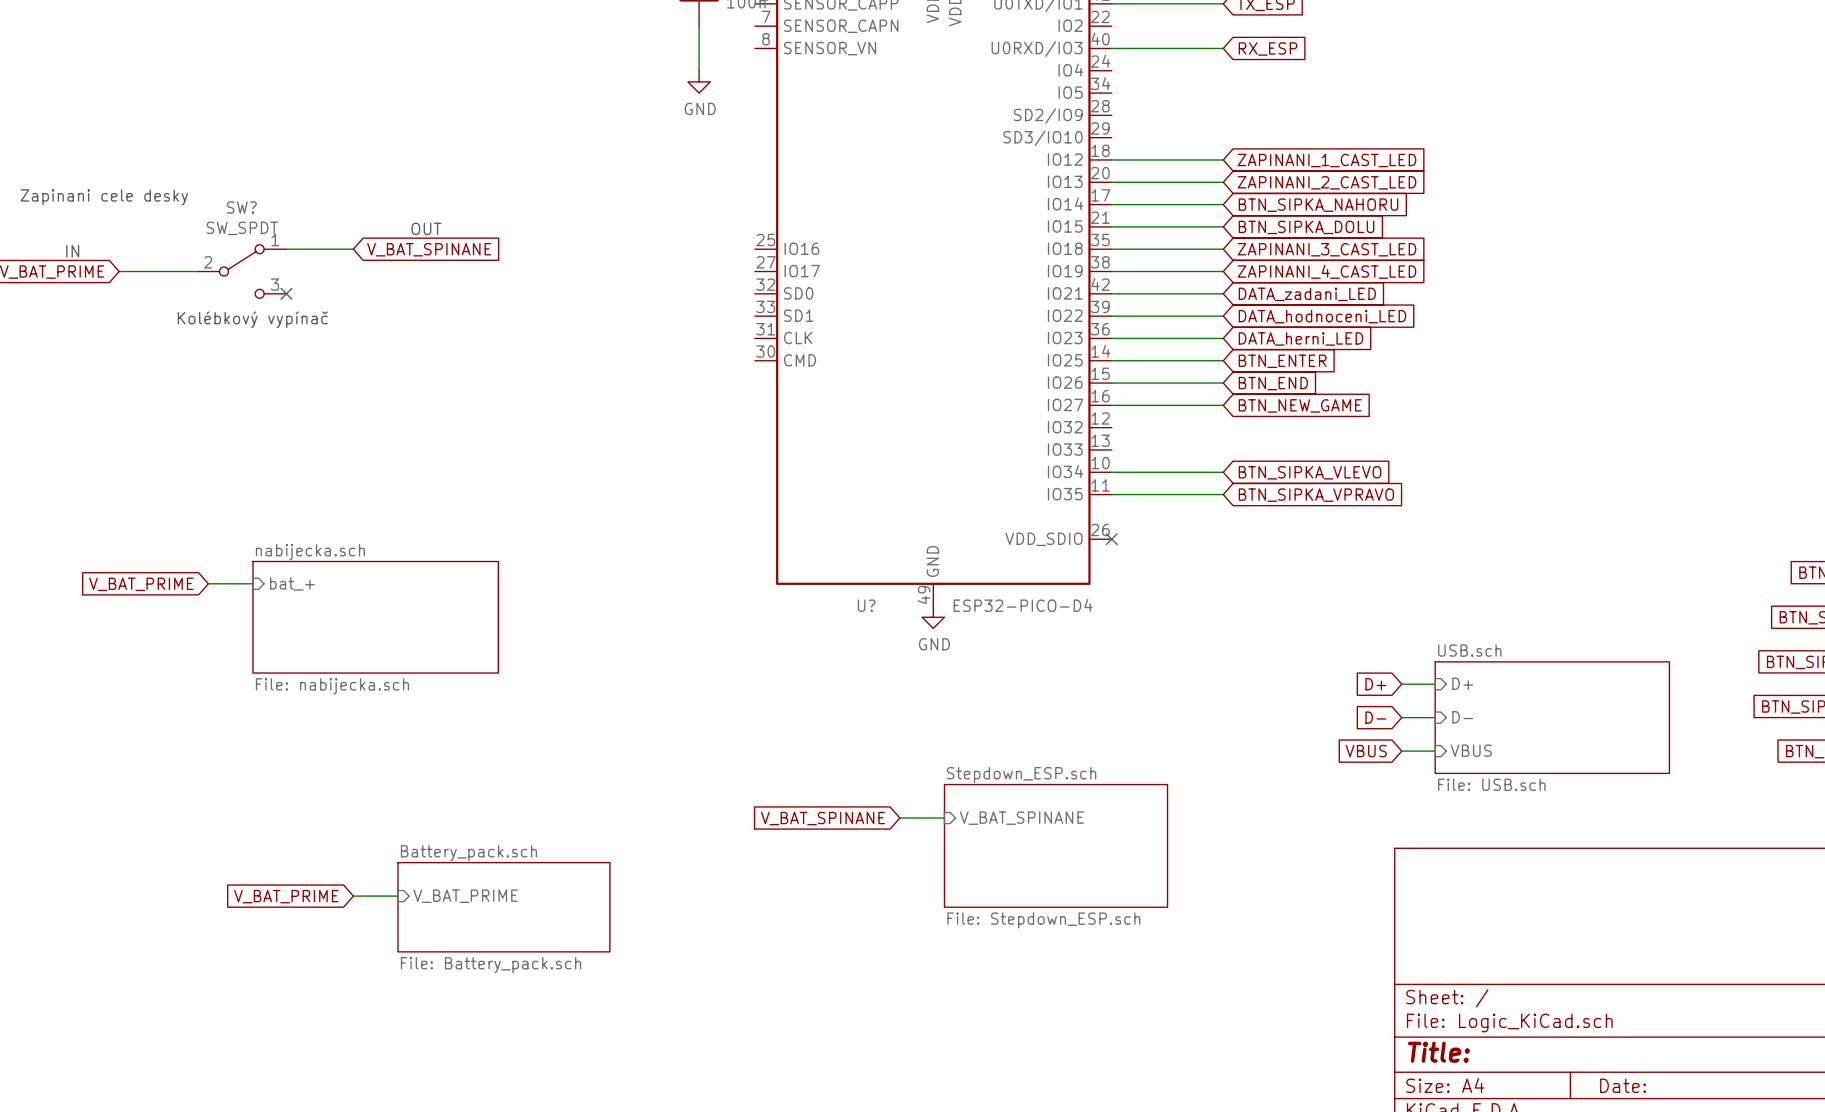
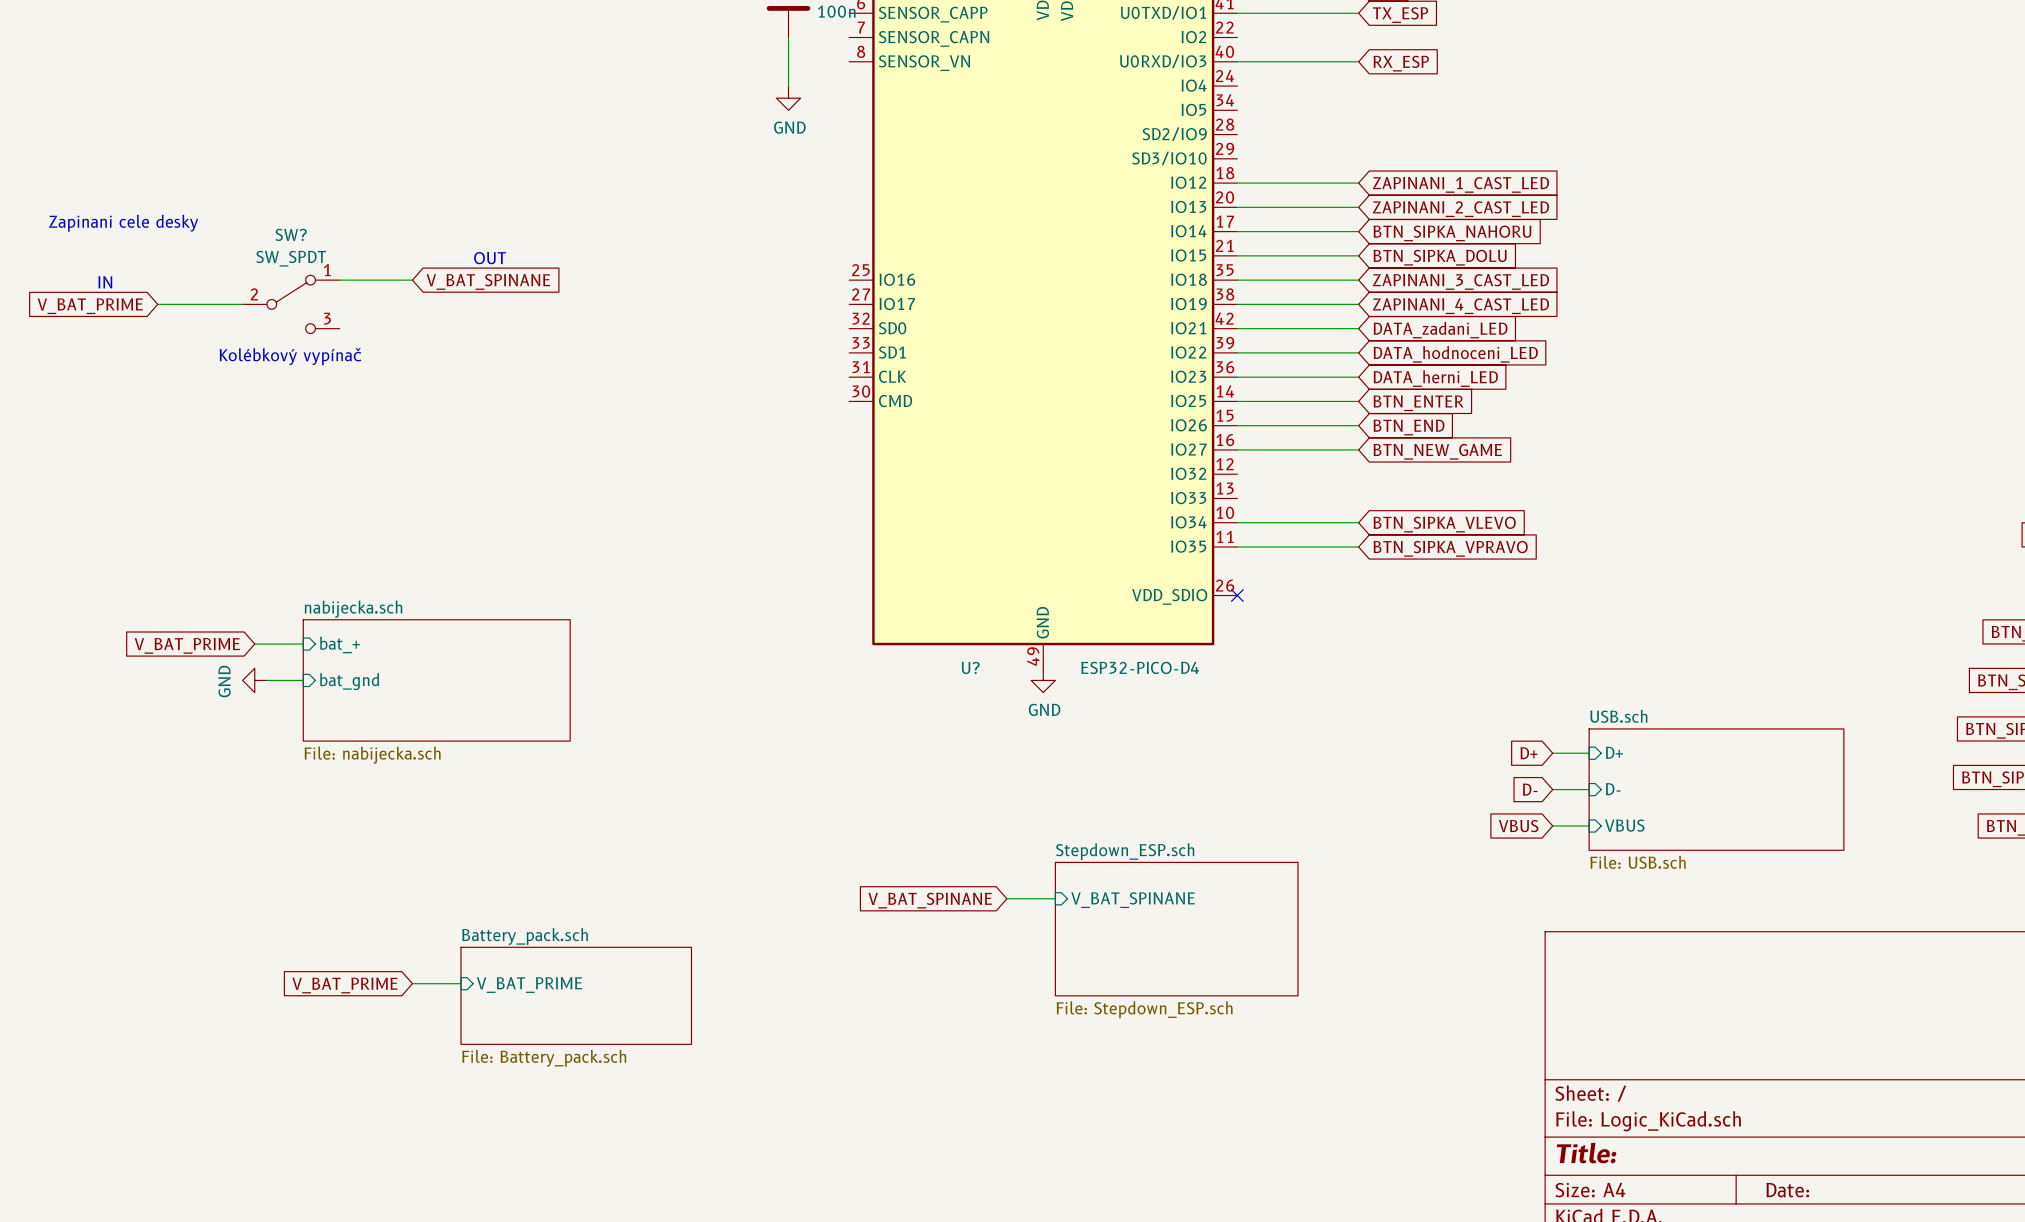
no-connect mark: (286, 293) -> none
power symbol: none -> GND (254, 680)
wire: none -> (266, 680) (303, 680)
sheet pin: none -> bat_gnd (349, 681)

